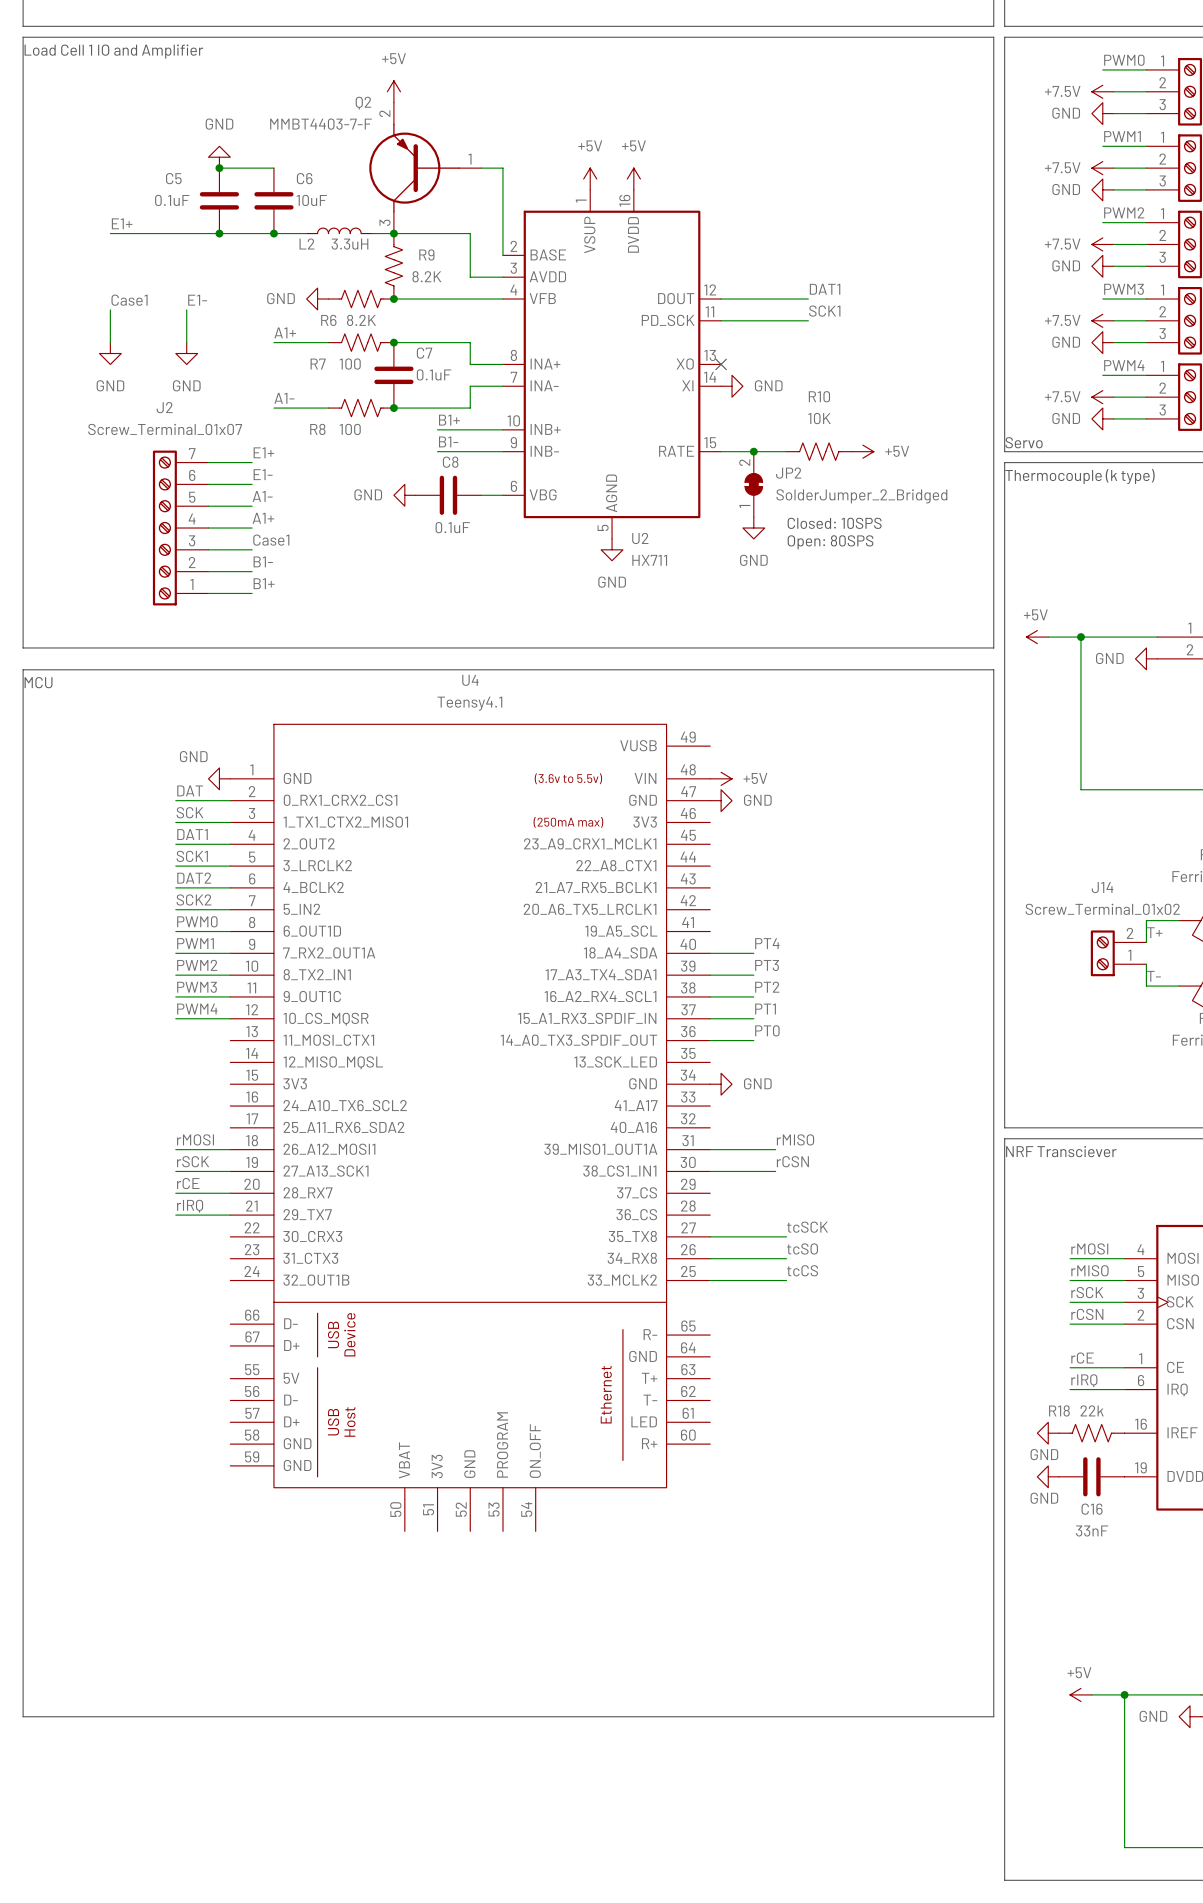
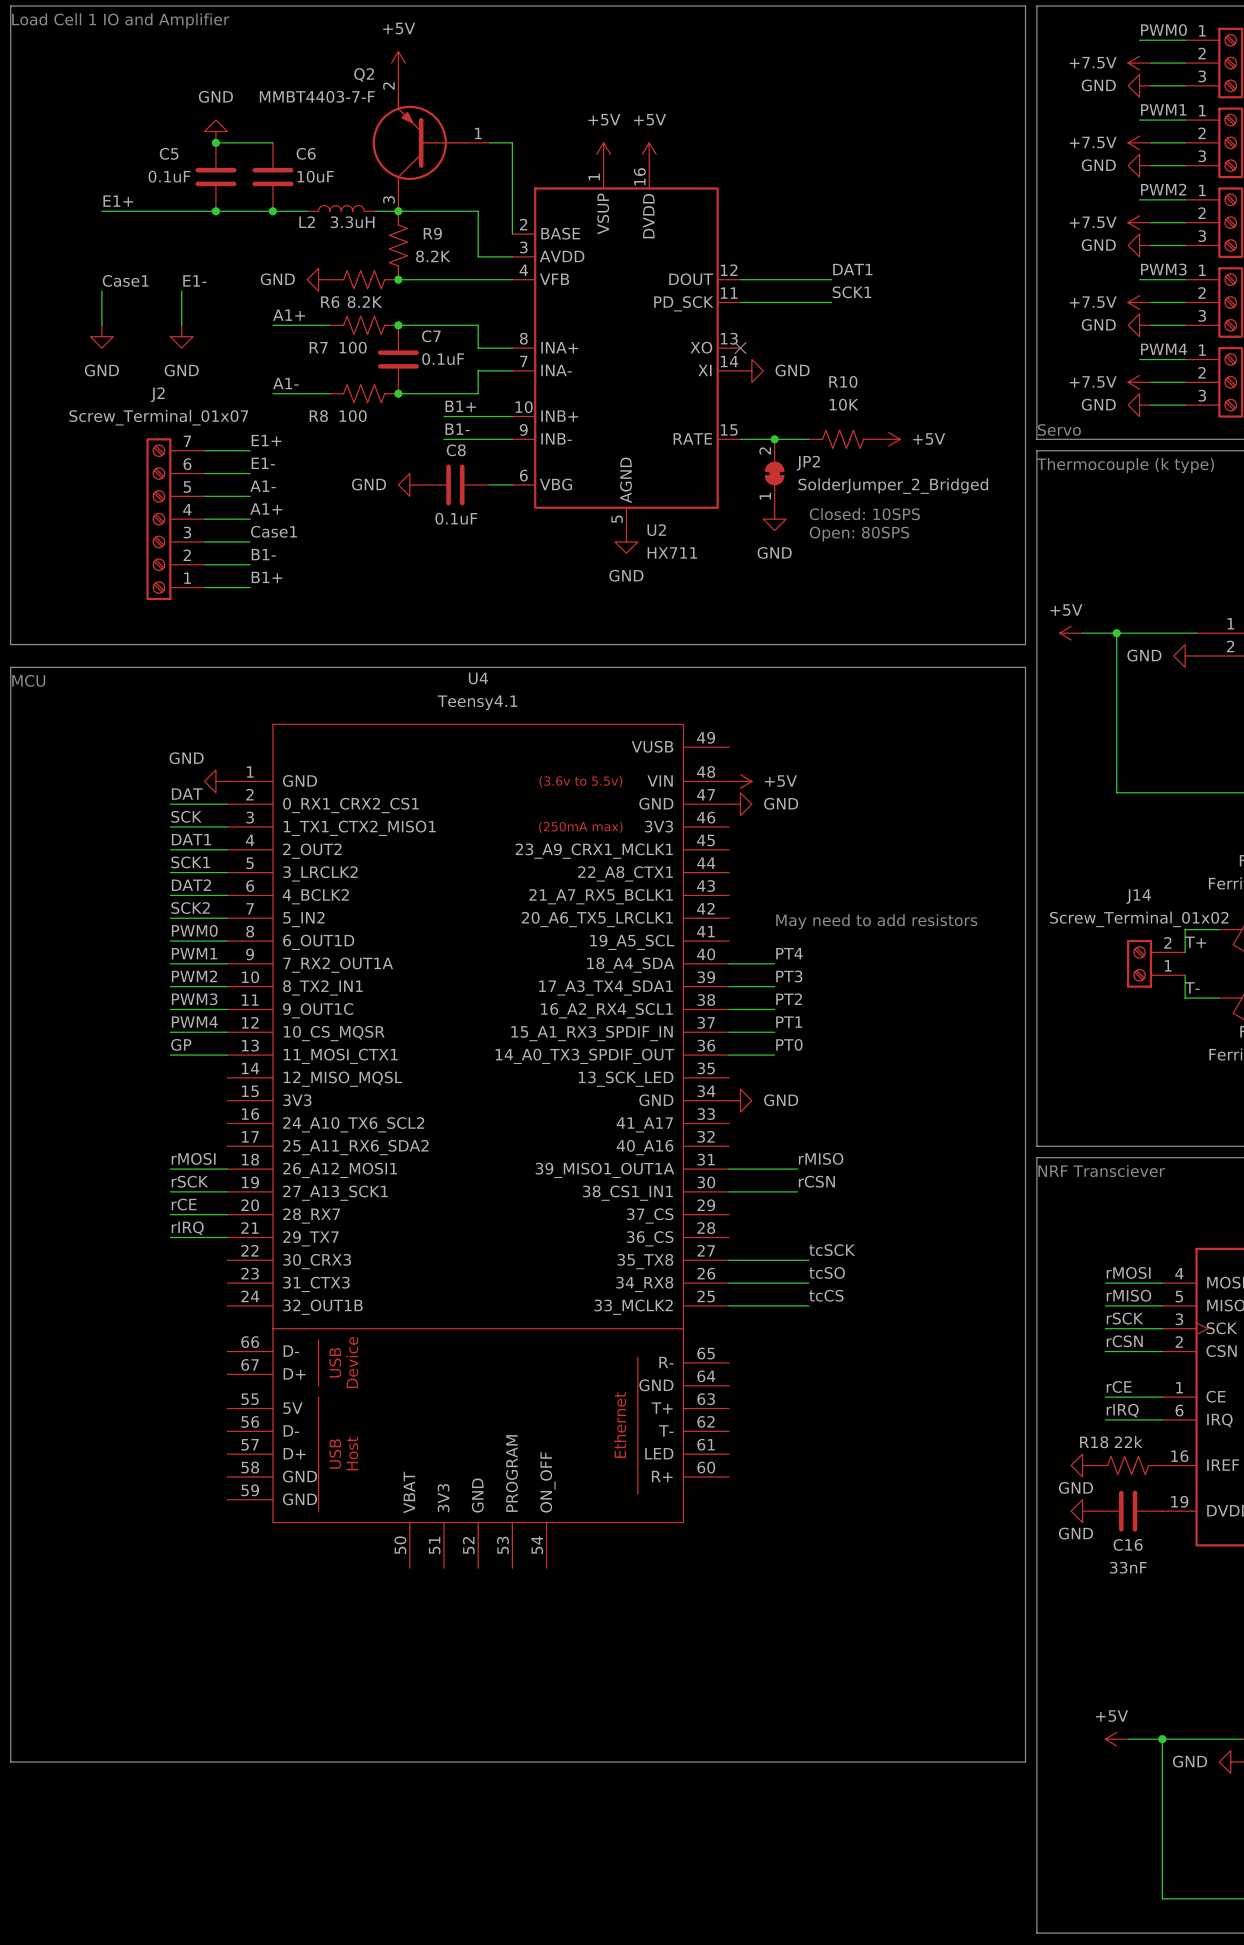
text: none -> May need to add resistors (876, 921)
label: none -> GP (181, 1044)
wire: none -> (170, 1055) (227, 1055)

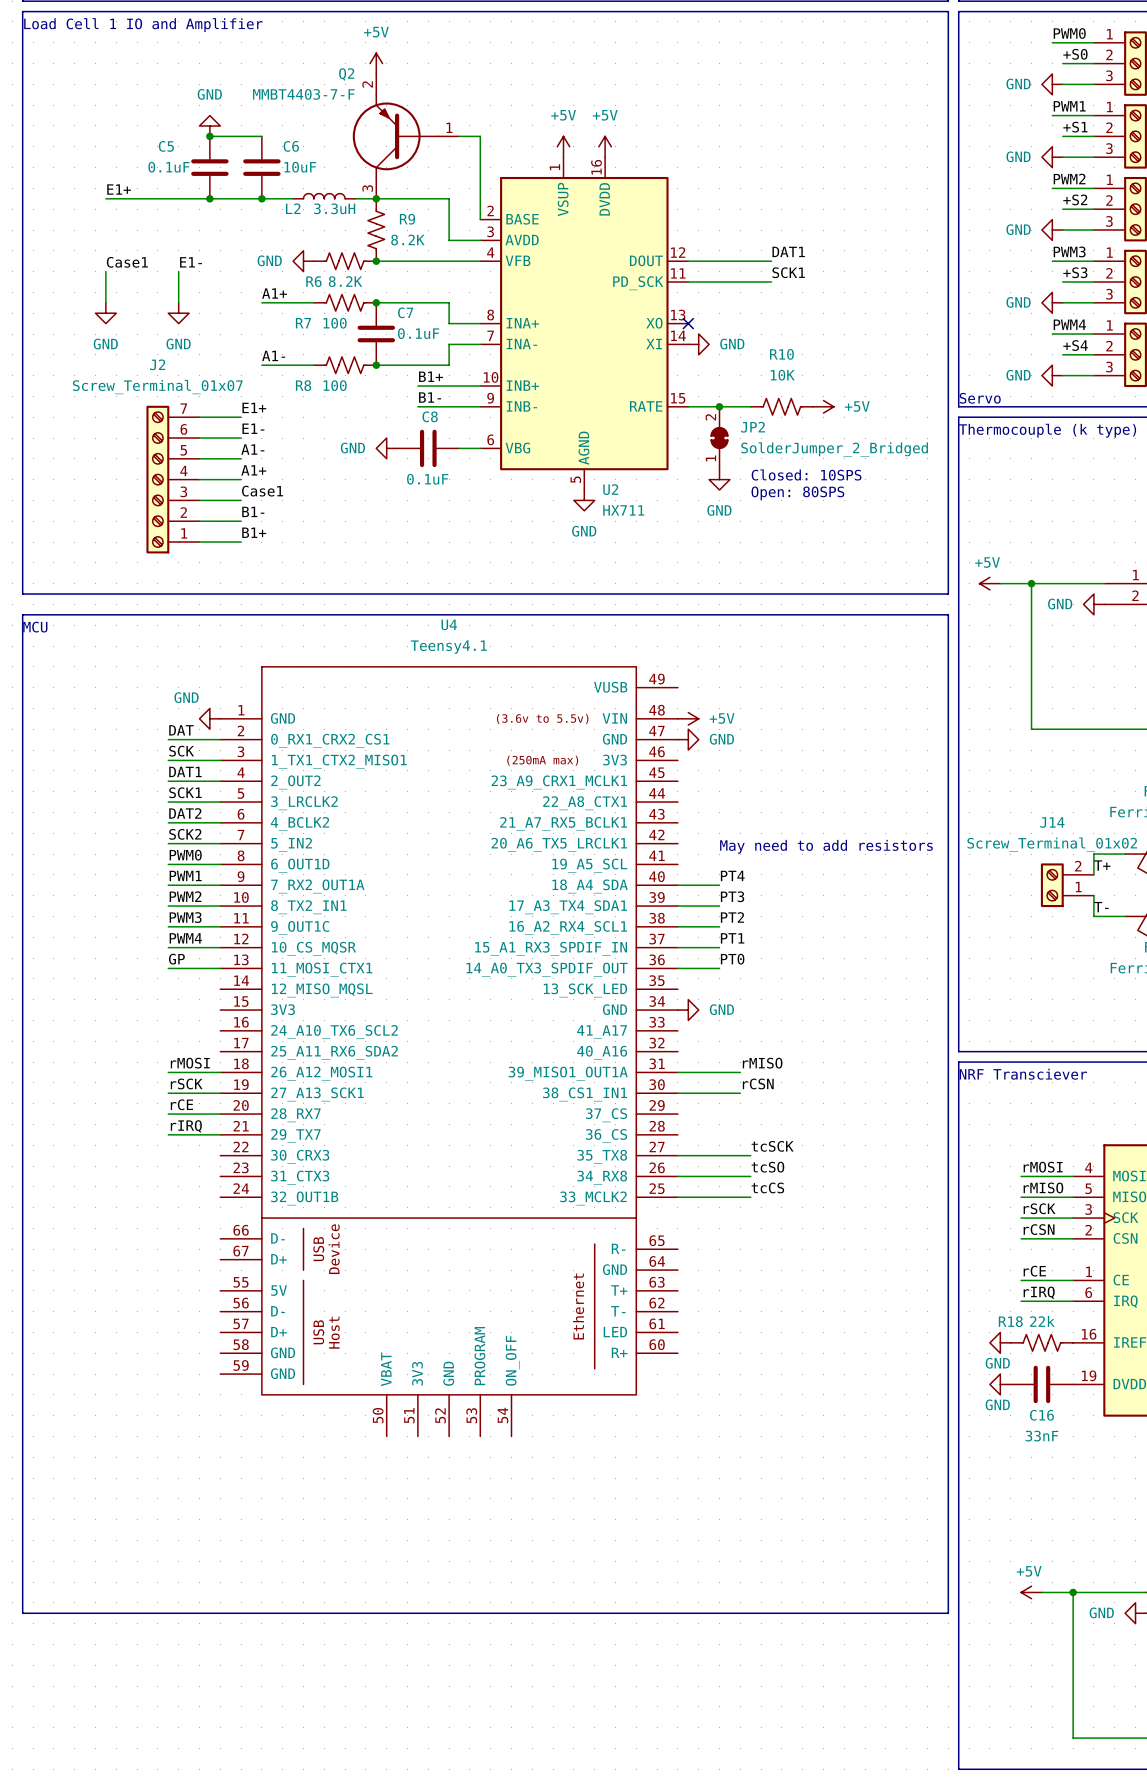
label: none -> +S0 (1075, 54)
power symbol: +7.5V (1139, 63) -> none
label: none -> +S1 (1075, 127)
power symbol: +7.5V (1139, 142) -> none
label: none -> +S2 (1075, 199)
power symbol: +7.5V (1139, 222) -> none
label: none -> +S3 (1075, 272)
power symbol: +7.5V (1139, 302) -> none
label: none -> +S4 (1075, 345)
power symbol: +7.5V (1139, 382) -> none

